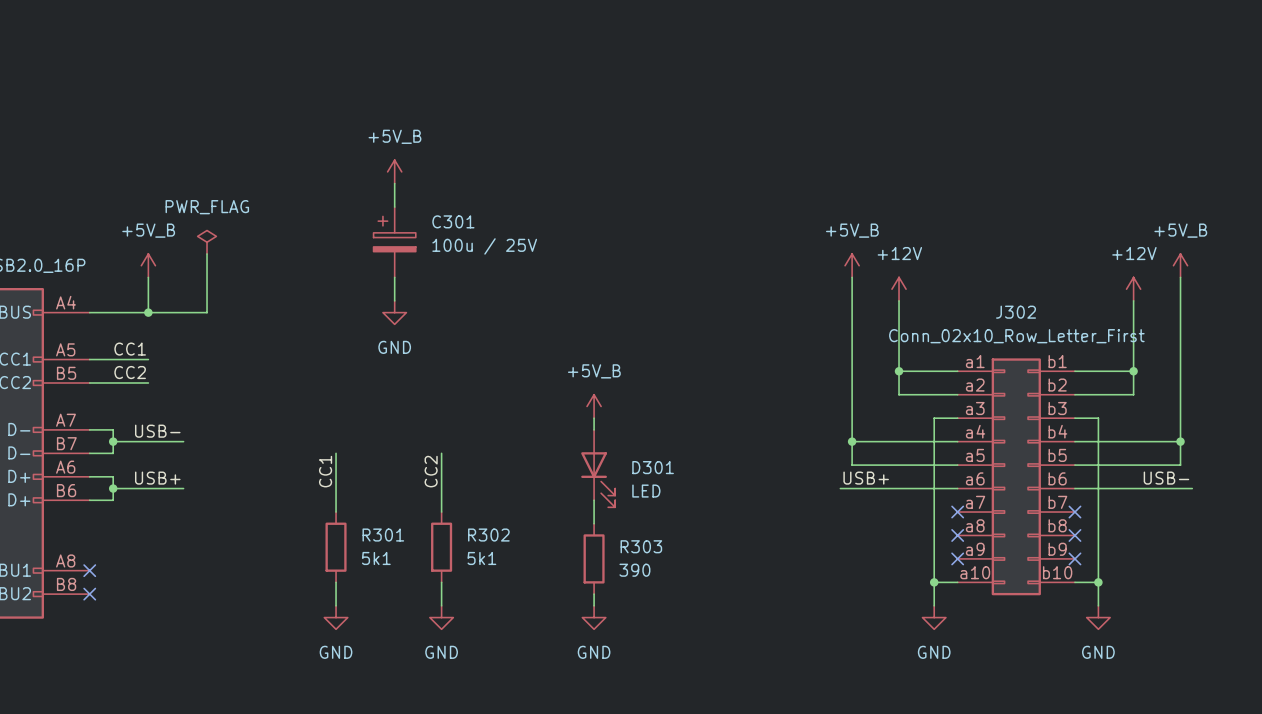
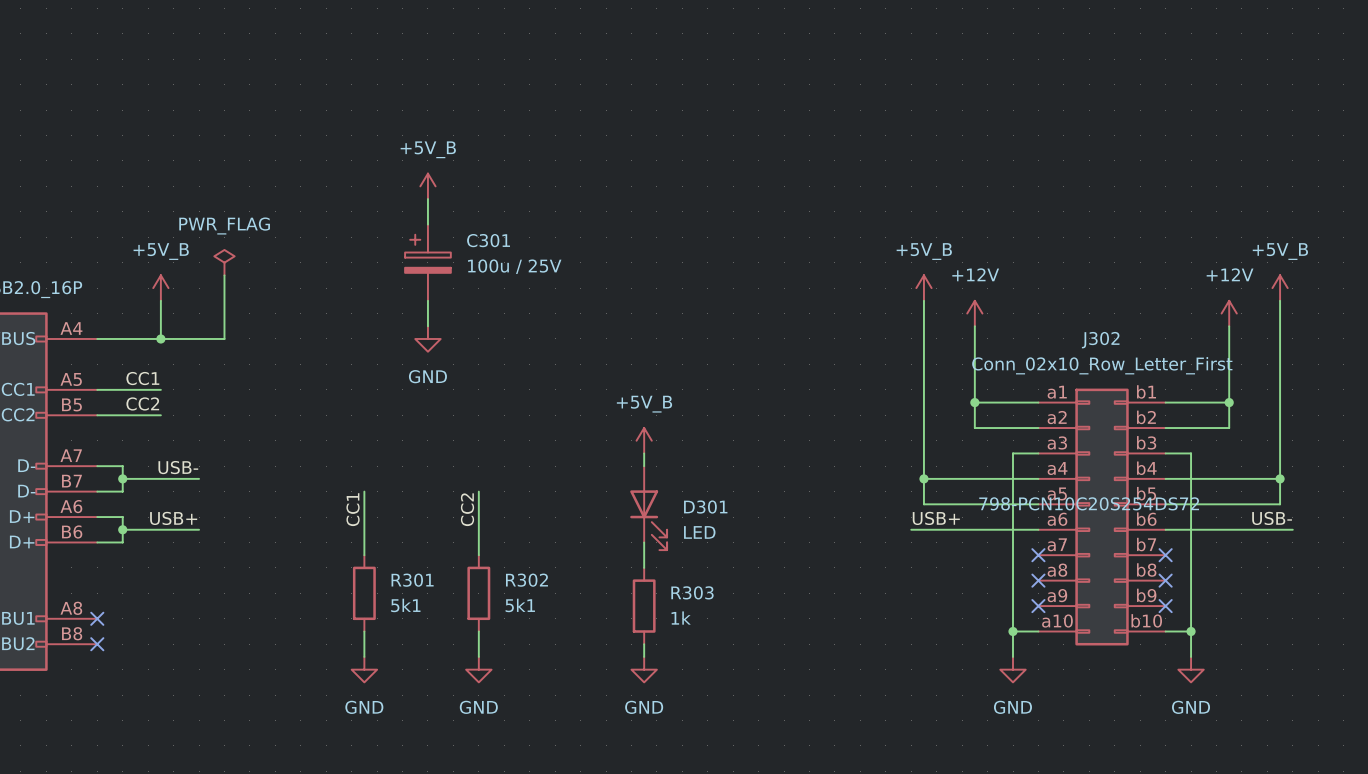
J302 text: none -> 798-PCN10C20S254DS72 (1089, 503)
R303 value: 390 (634, 570) -> 1k (681, 618)

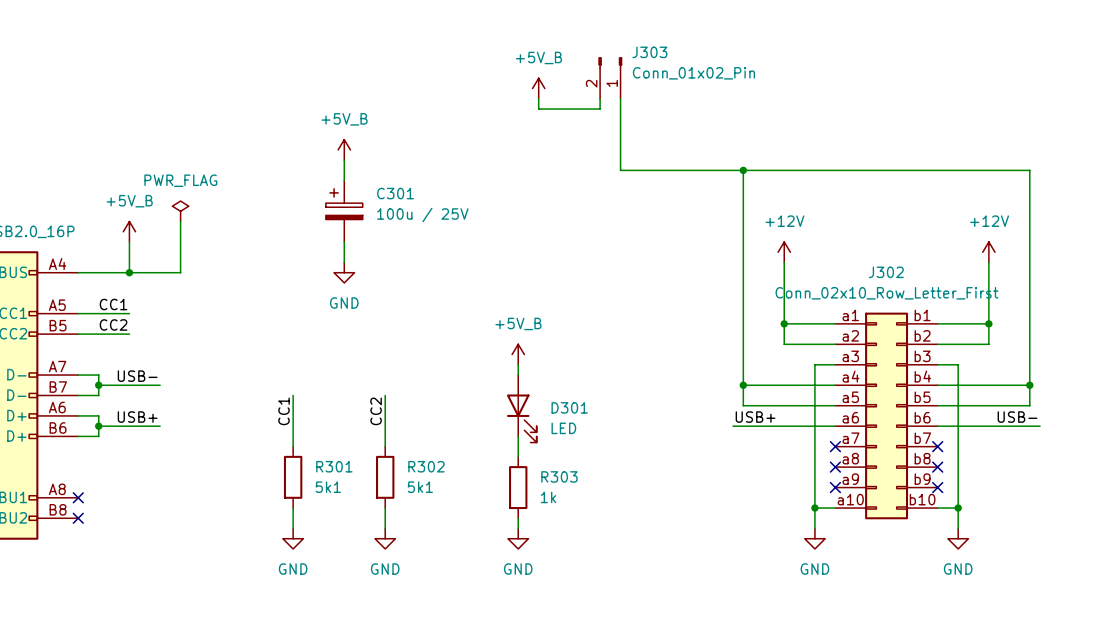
J303: none -> Conn_01x02_Pin (610, 78)
power symbol: none -> +5V_B (538, 88)
wire: none -> (538, 98) (538, 109) (600, 109) (600, 98)
wire: none -> (620, 98) (620, 170) (1029, 170) (1029, 242)
wire: none -> (743, 170) (743, 242)
junction: none -> (743, 170)
power symbol: +5V_B (923, 288) -> none
power symbol: +5V_B (1280, 288) -> none
J302 text: 798-PCN10C20S254DS72 (1089, 503) -> none

